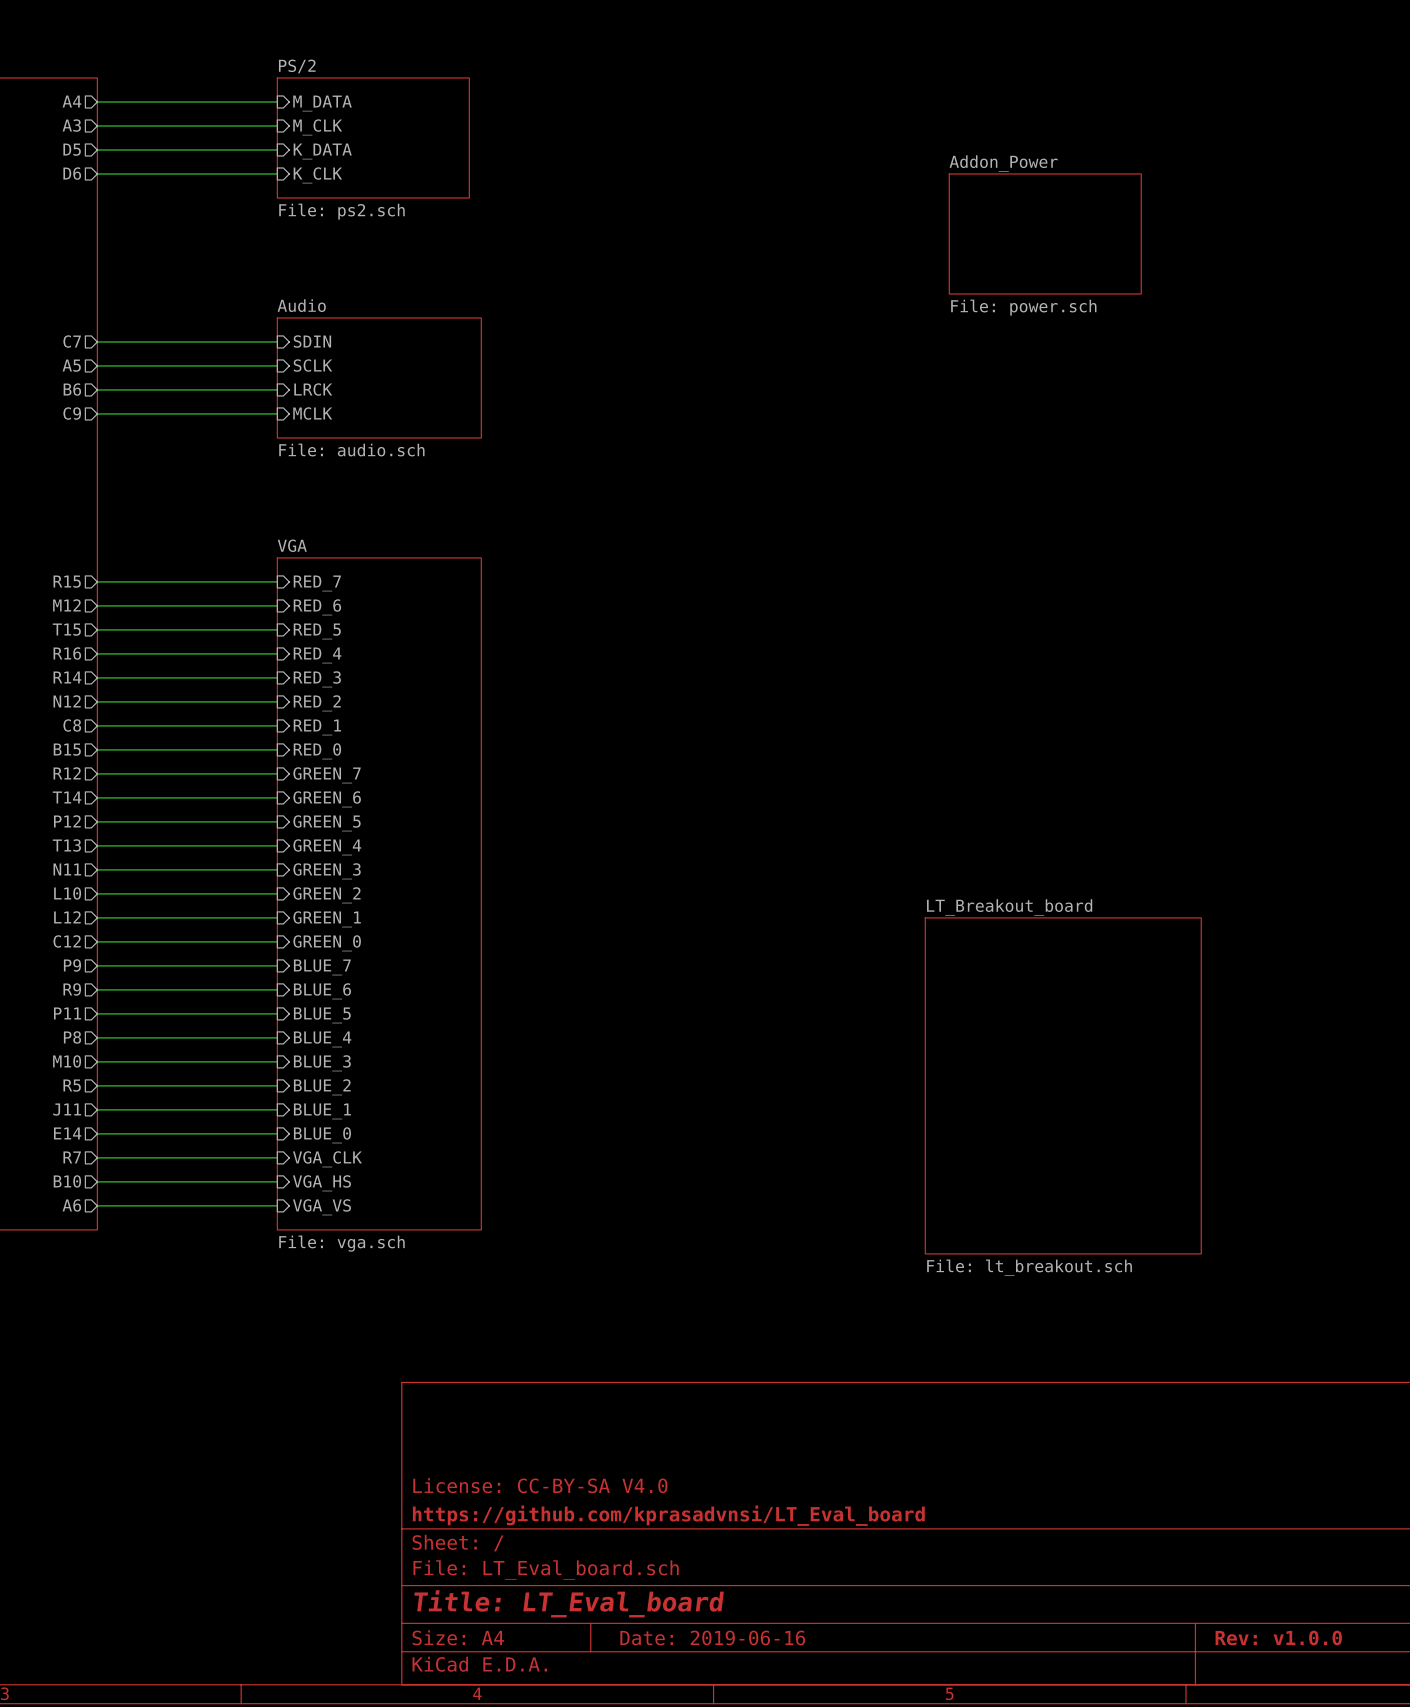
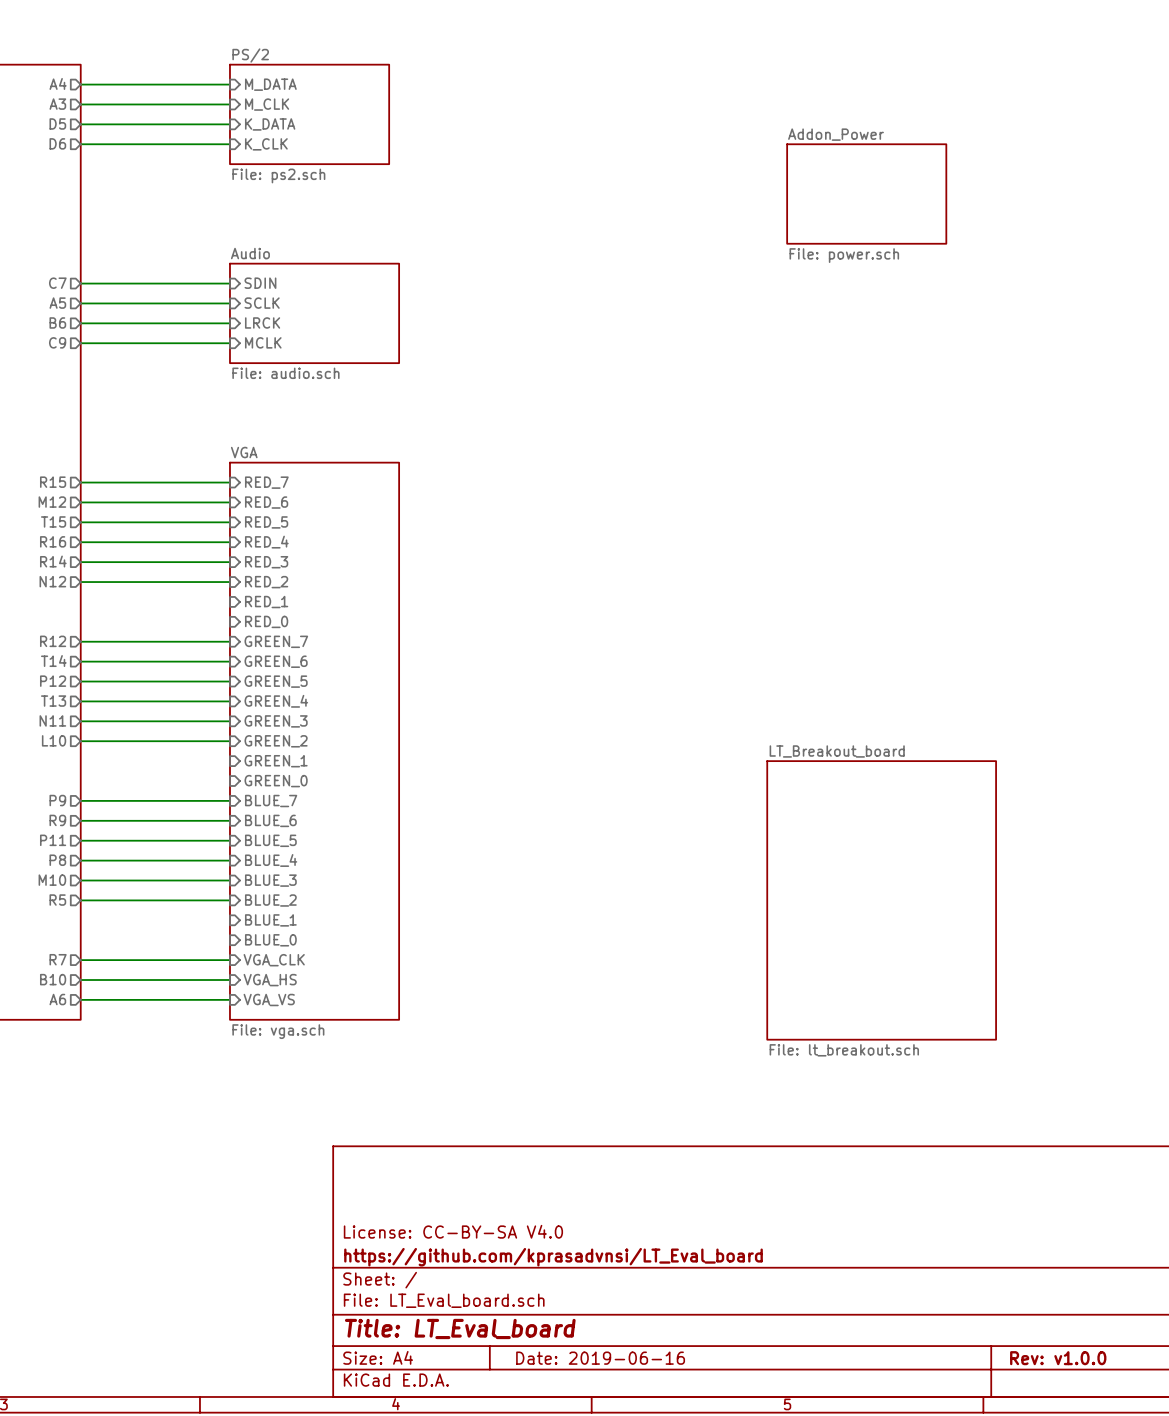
sheet pin: C8 (72, 725) -> none
wire: (97, 725) (277, 725) -> none
sheet pin: B15 (67, 749) -> none
wire: (97, 749) (277, 749) -> none
sheet pin: L12 (67, 917) -> none
wire: (97, 917) (277, 917) -> none
sheet pin: C12 (67, 941) -> none
wire: (97, 941) (277, 941) -> none
sheet pin: J11 (67, 1109) -> none
wire: (97, 1109) (277, 1109) -> none
sheet pin: E14 (67, 1133) -> none
wire: (97, 1133) (277, 1133) -> none

